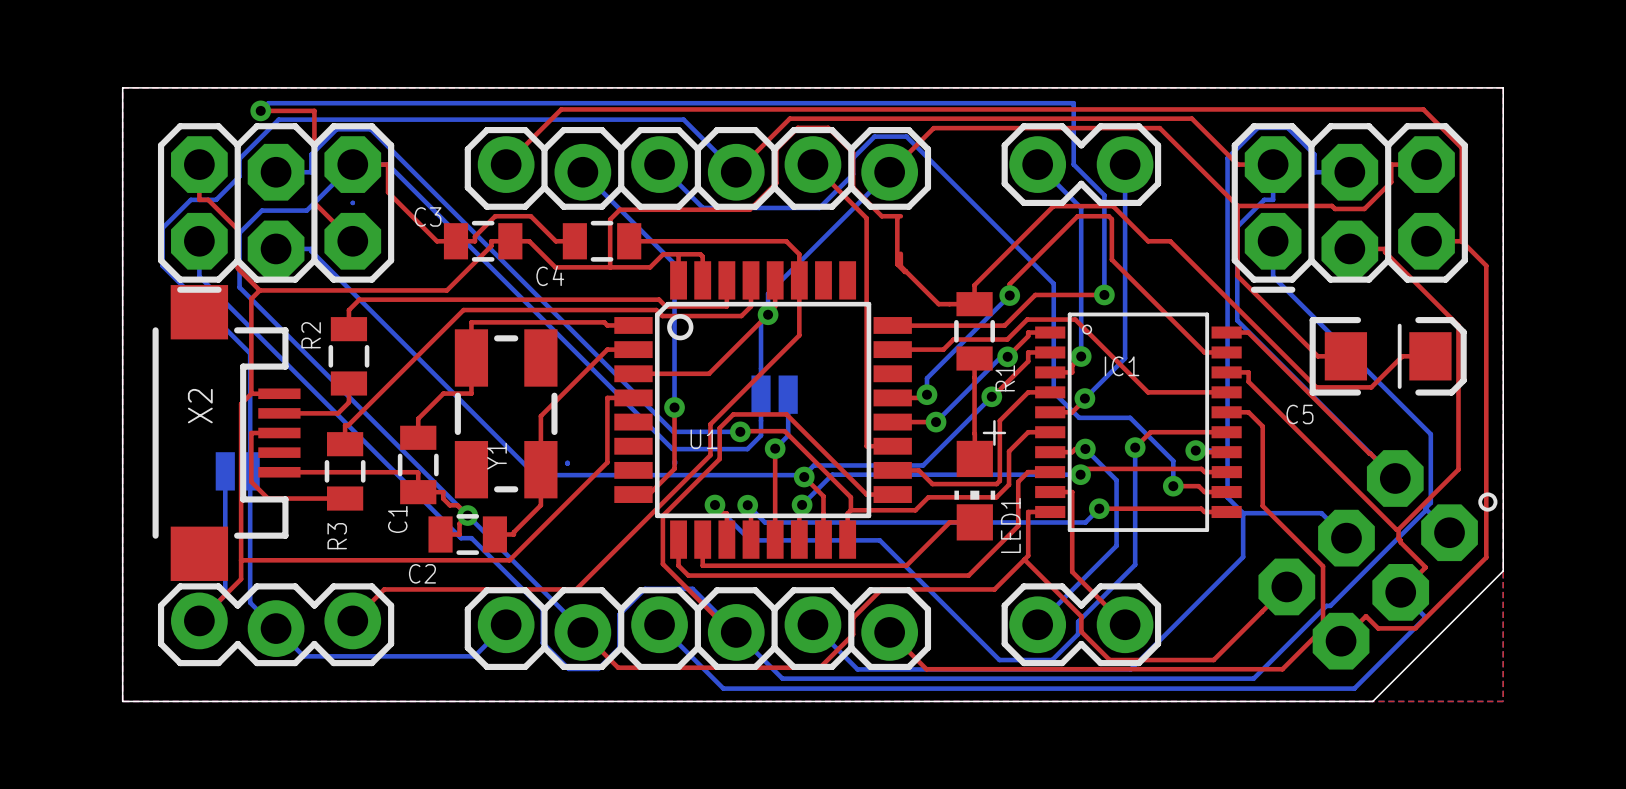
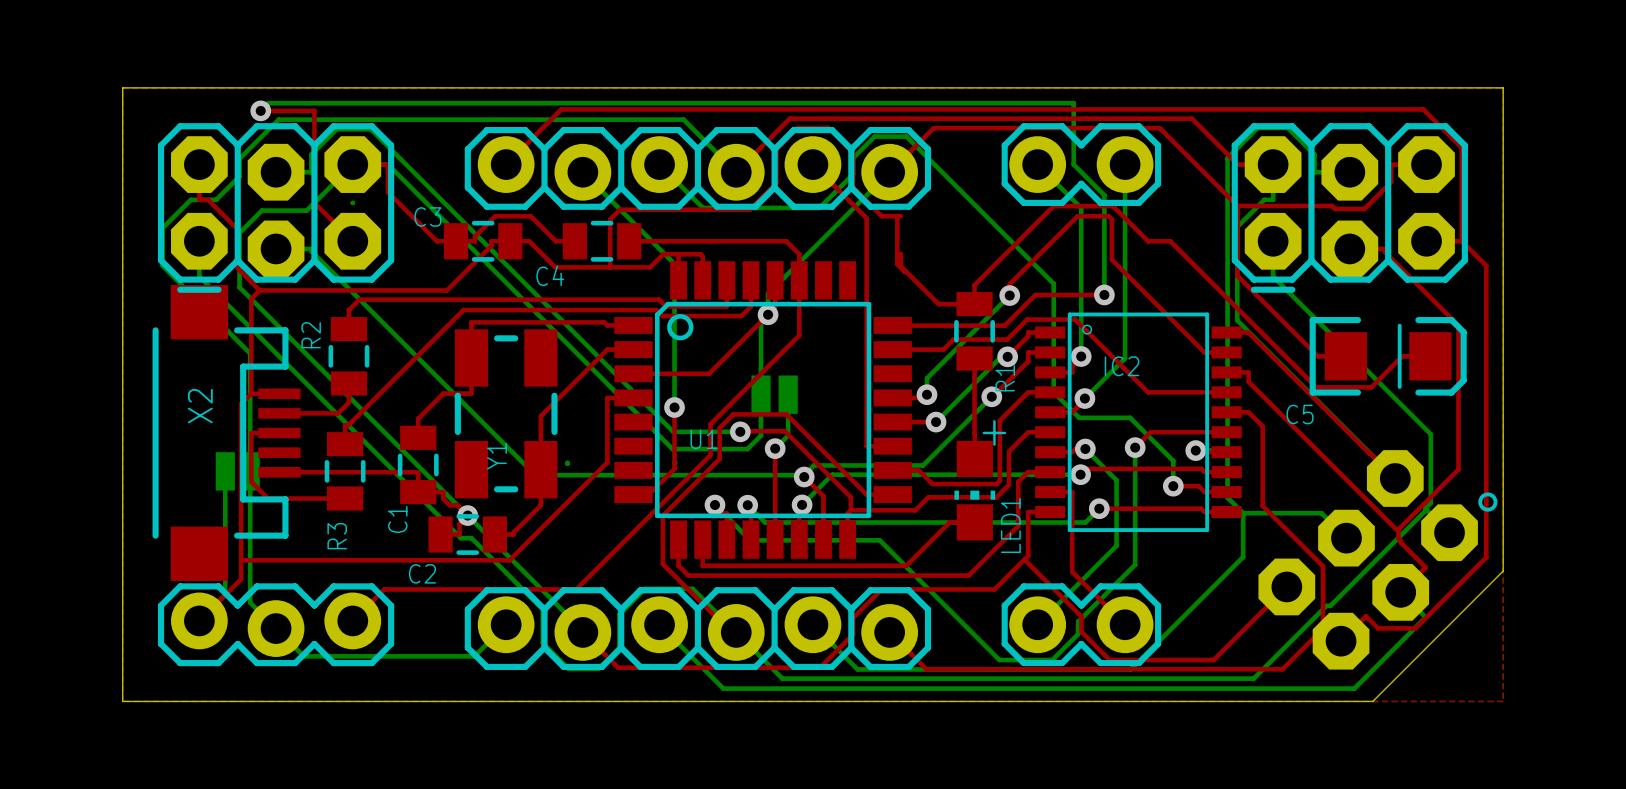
IC1 name: IC1 (1122, 366) -> IC2 (1122, 366)

